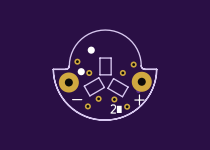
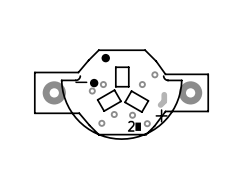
via position: (77, 61) -> (92, 91)
board edge: (69, 66) (71, 53) (81, 39) (96, 31) (109, 30) (118, 32) (129, 39) (138, 53) (141, 67) (156, 69) (156, 74) (150, 93) (137, 108) (120, 117) (99, 119) (75, 111) (59, 93) (53, 69) (66, 69) (69, 66) -> (98, 50) (78, 72) (34, 72) (34, 113) (79, 113) (98, 134) (146, 134) (165, 111) (208, 111) (208, 74) (165, 74) (145, 50) (98, 50)
via position: (141, 81) -> (190, 92)
via position: (68, 82) -> (54, 92)
text position: - (77, 99) -> - (81, 82)

